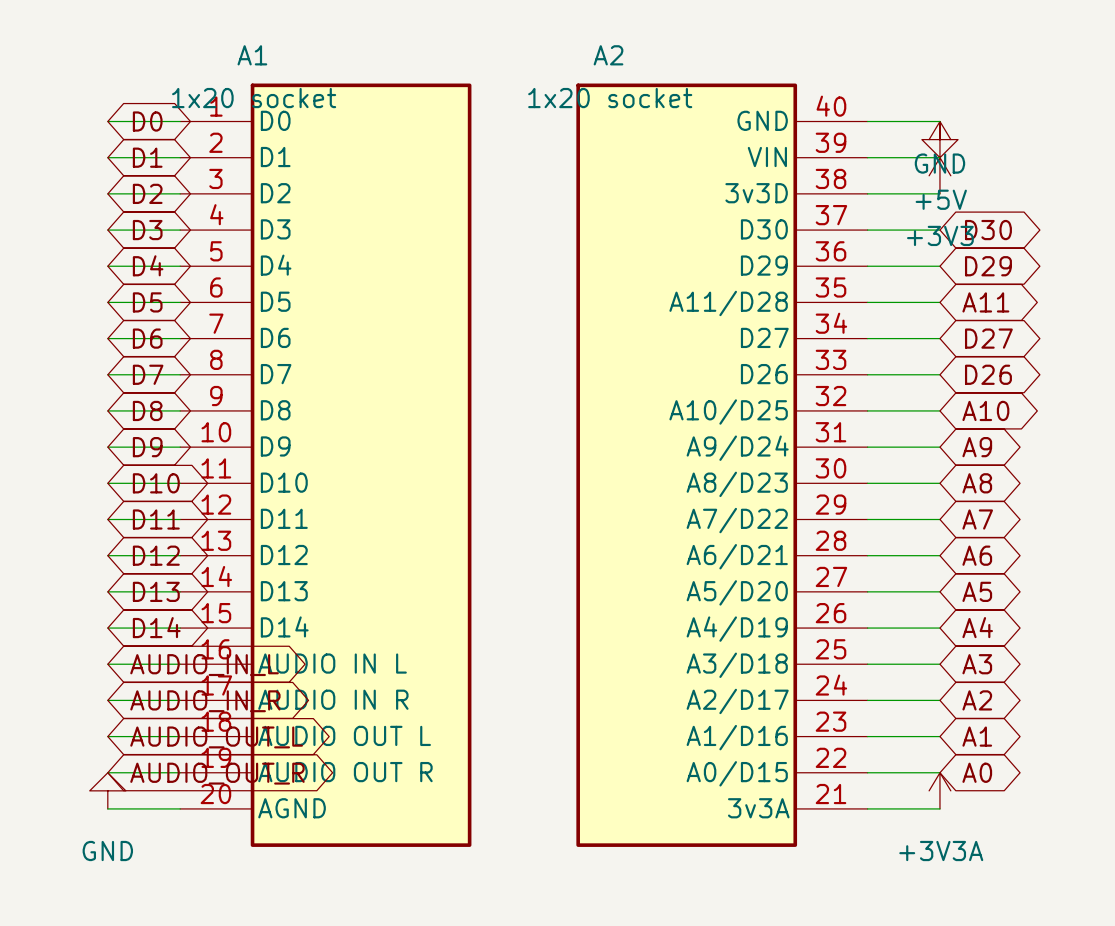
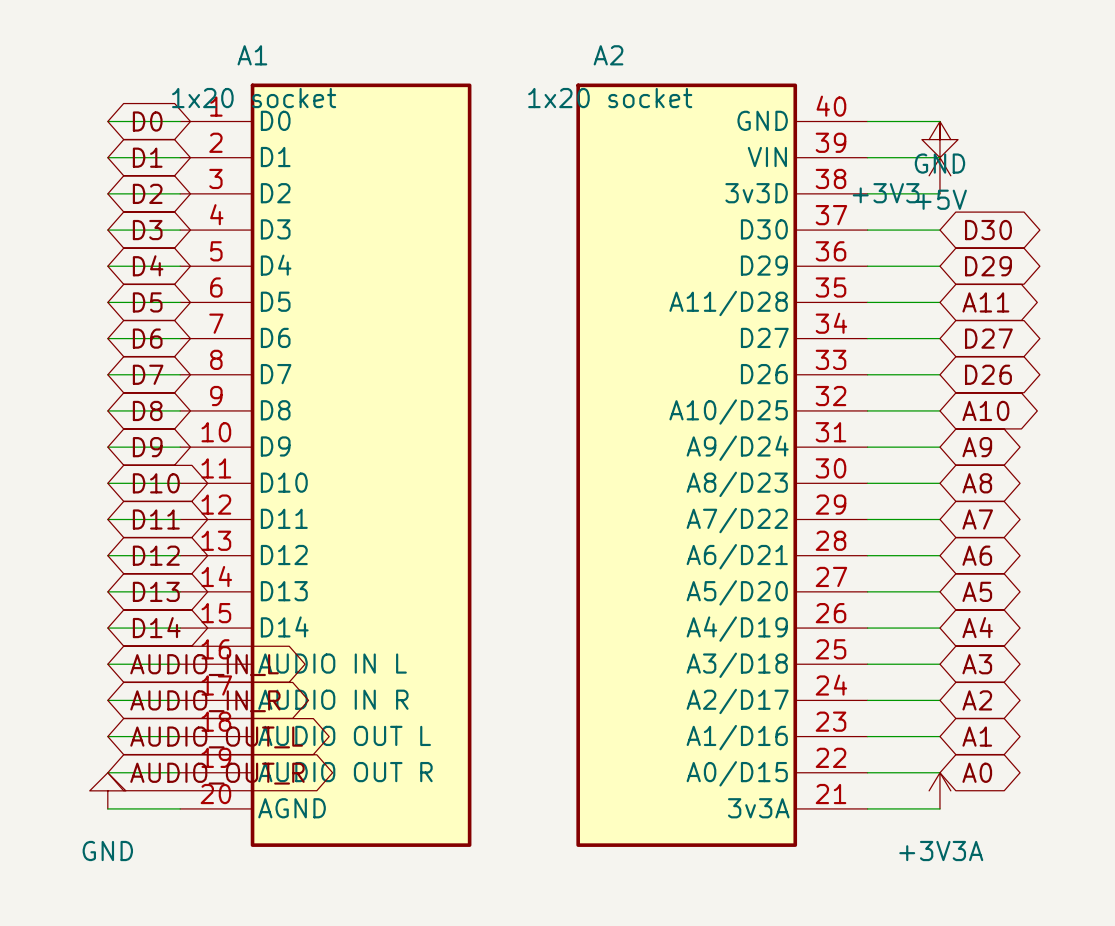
power symbol text position: +3V3 (940, 235) -> +3V3 (886, 193)

